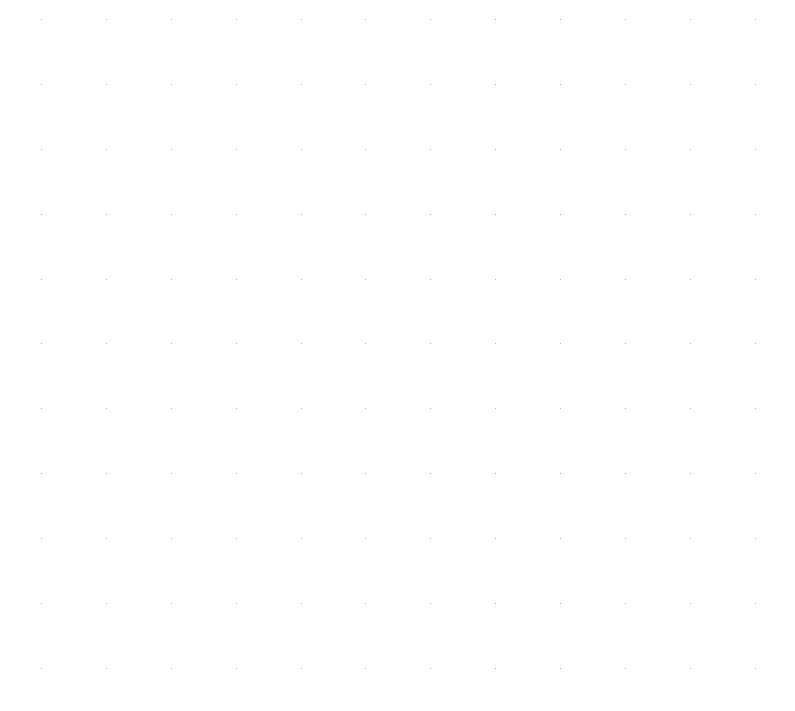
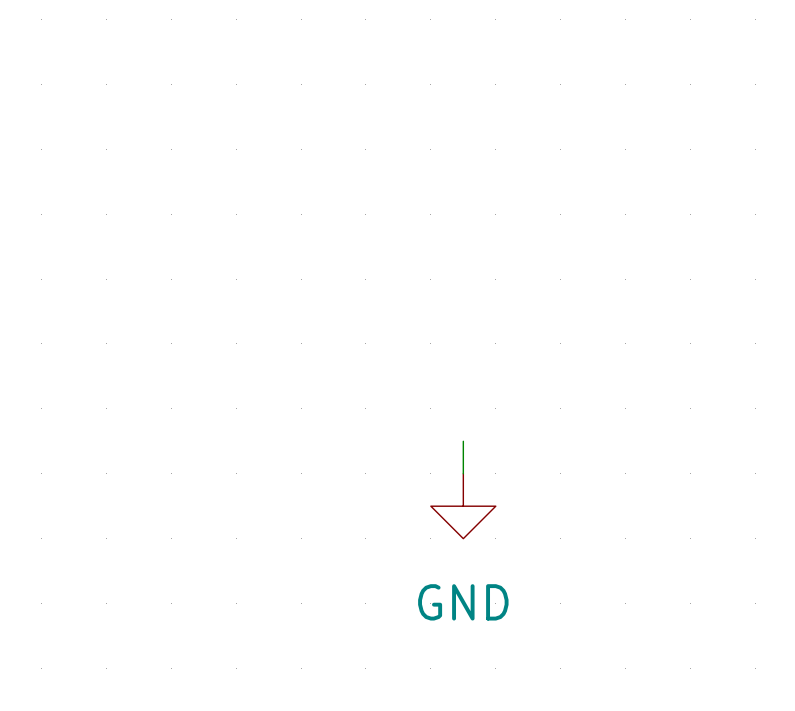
wire: none -> (463, 441) (463, 473)
power symbol: none -> GND (463, 506)

